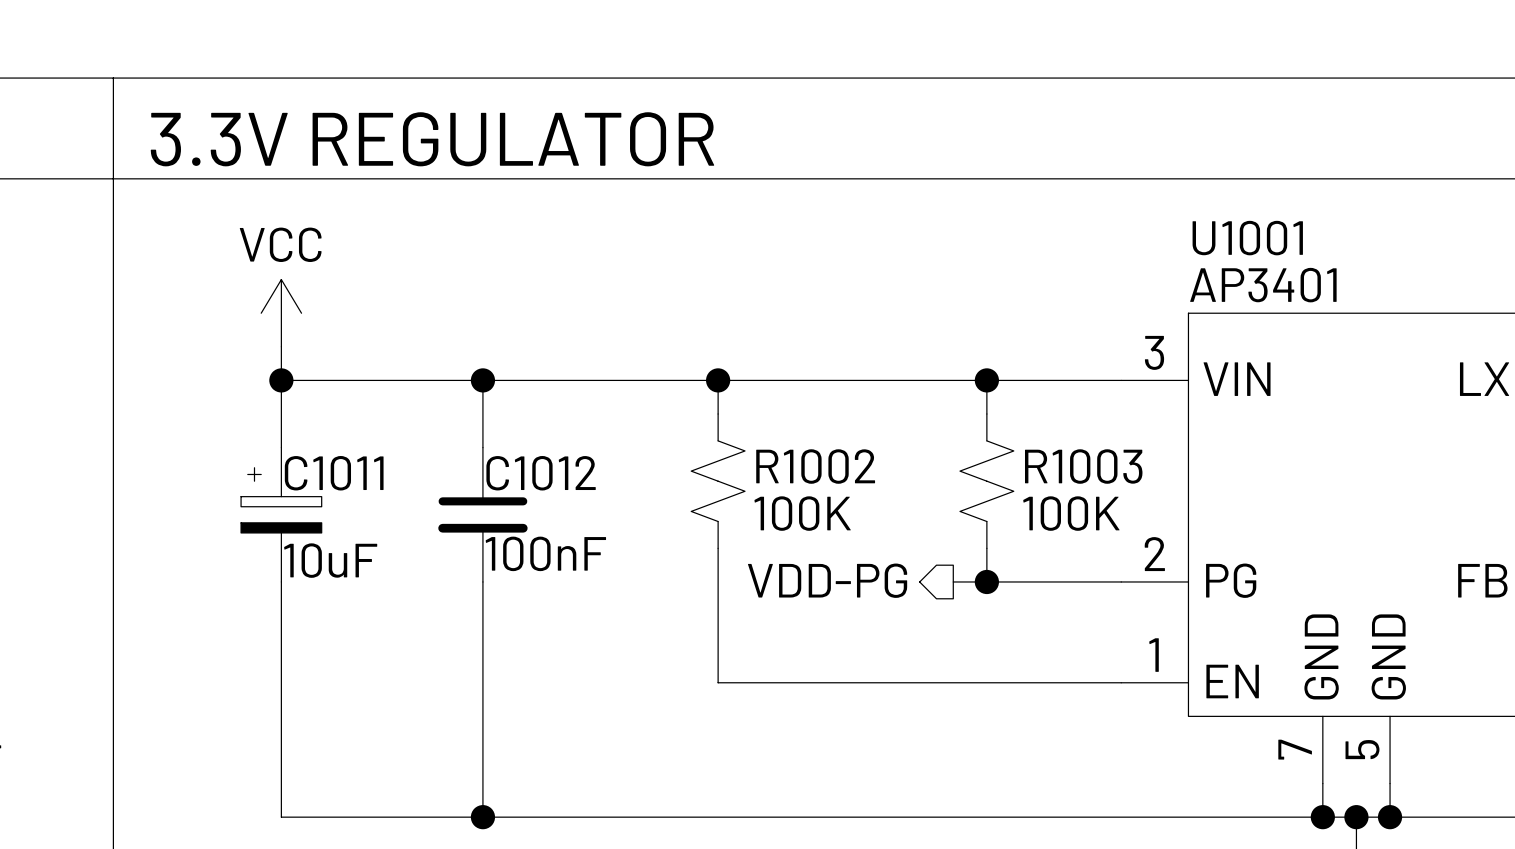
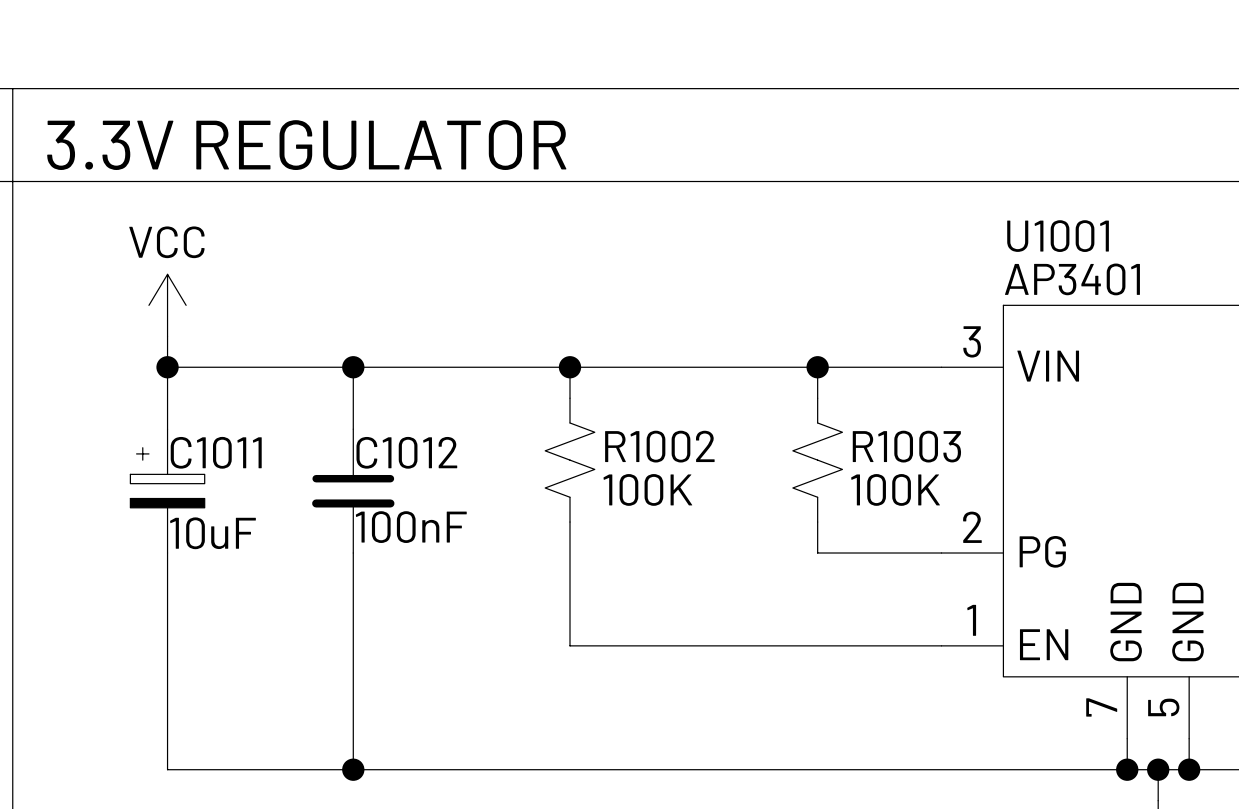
hierarchical label: VDD-PG (827, 580) -> none
wire: (953, 581) (986, 581) -> none
junction: (986, 581) -> none

